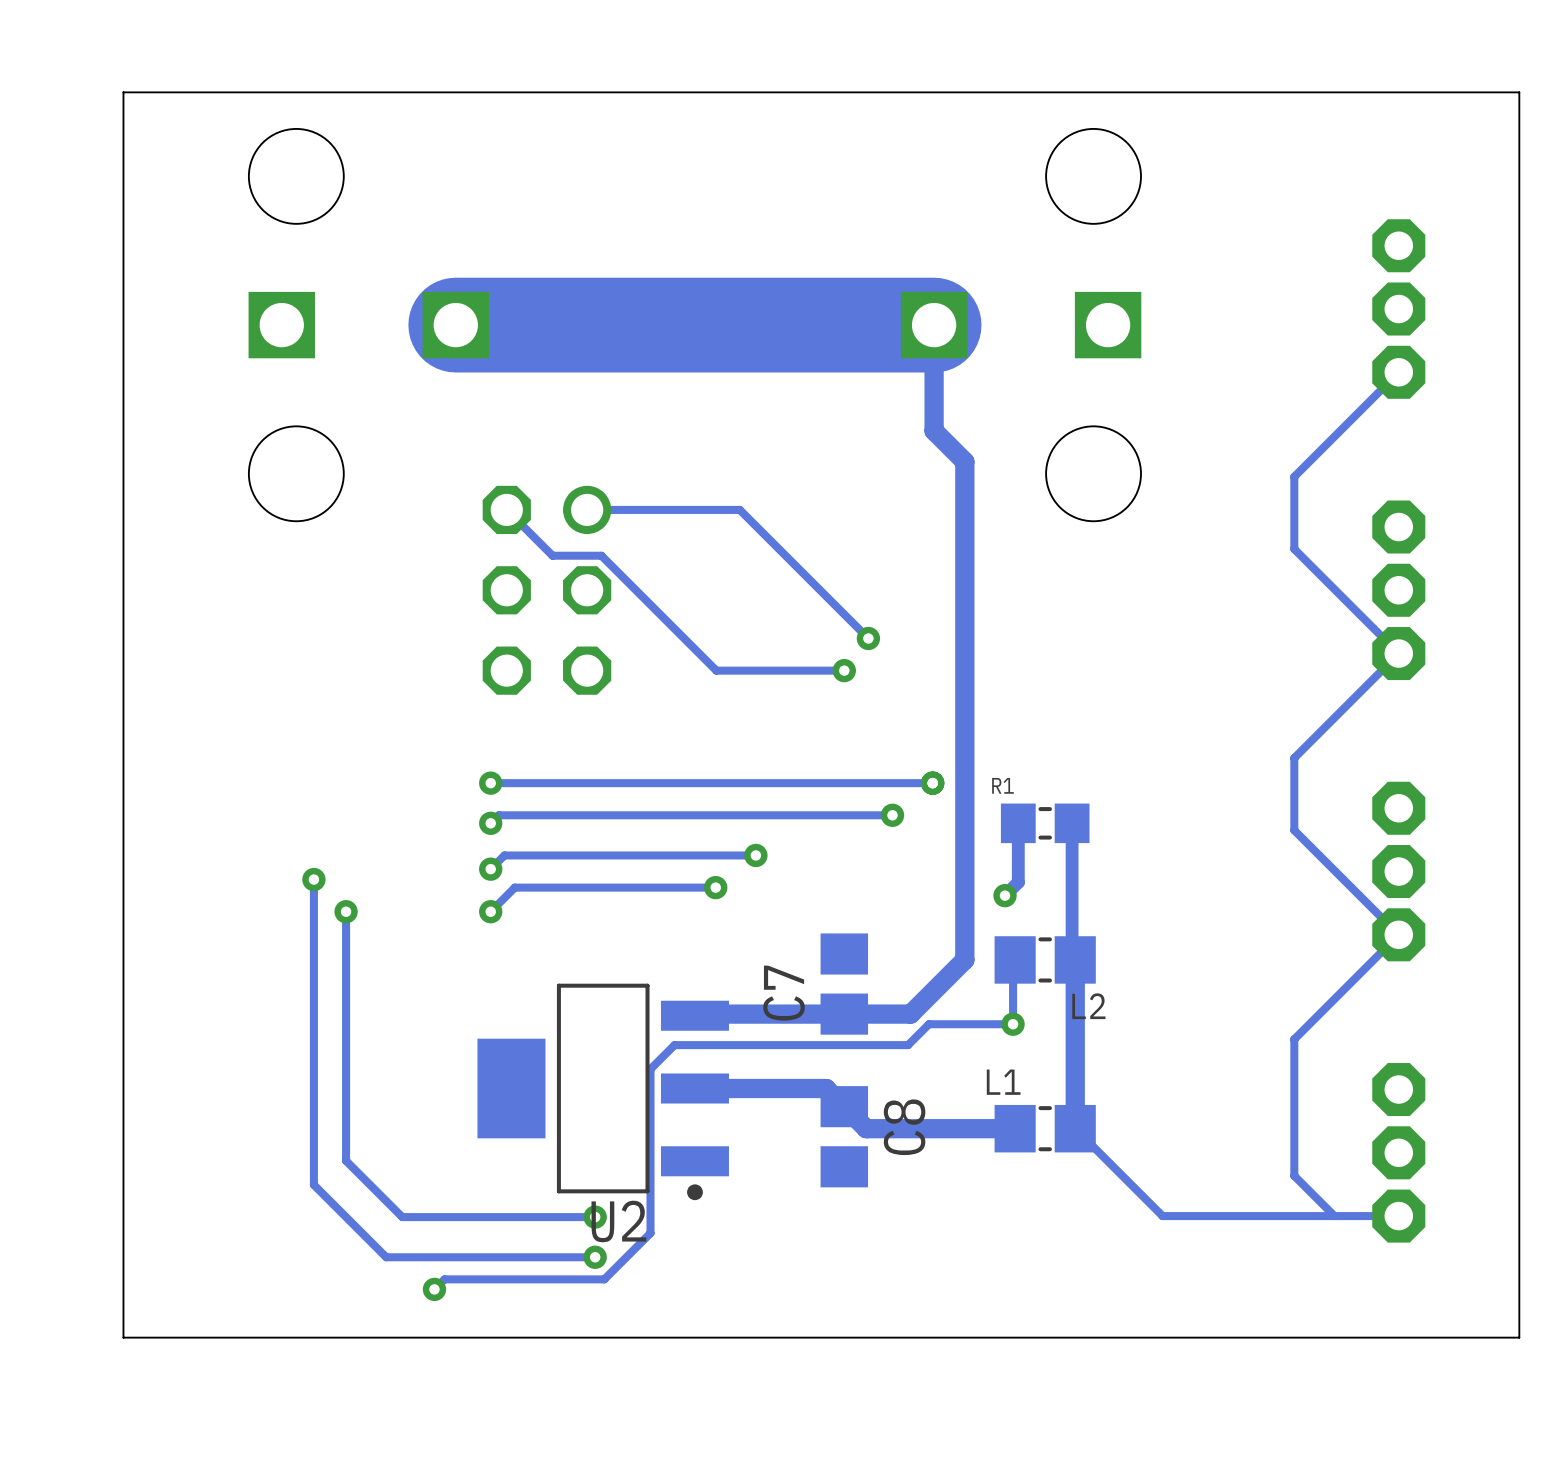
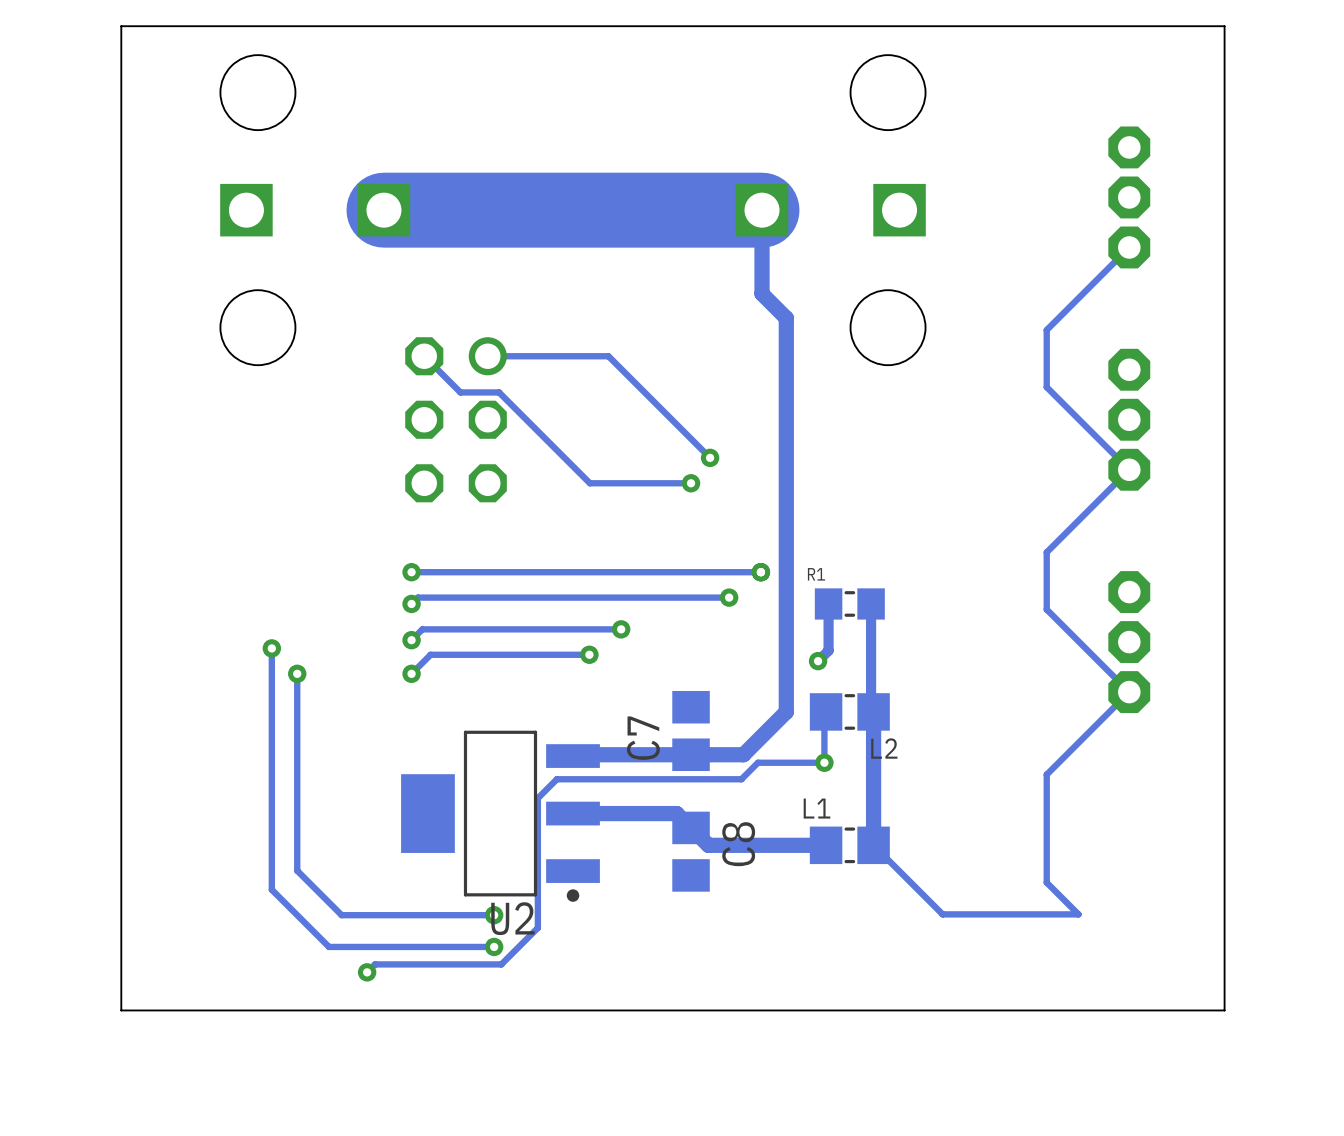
part: (1398, 1152) -> none
track: (1398, 1216) (1334, 1216) -> none

